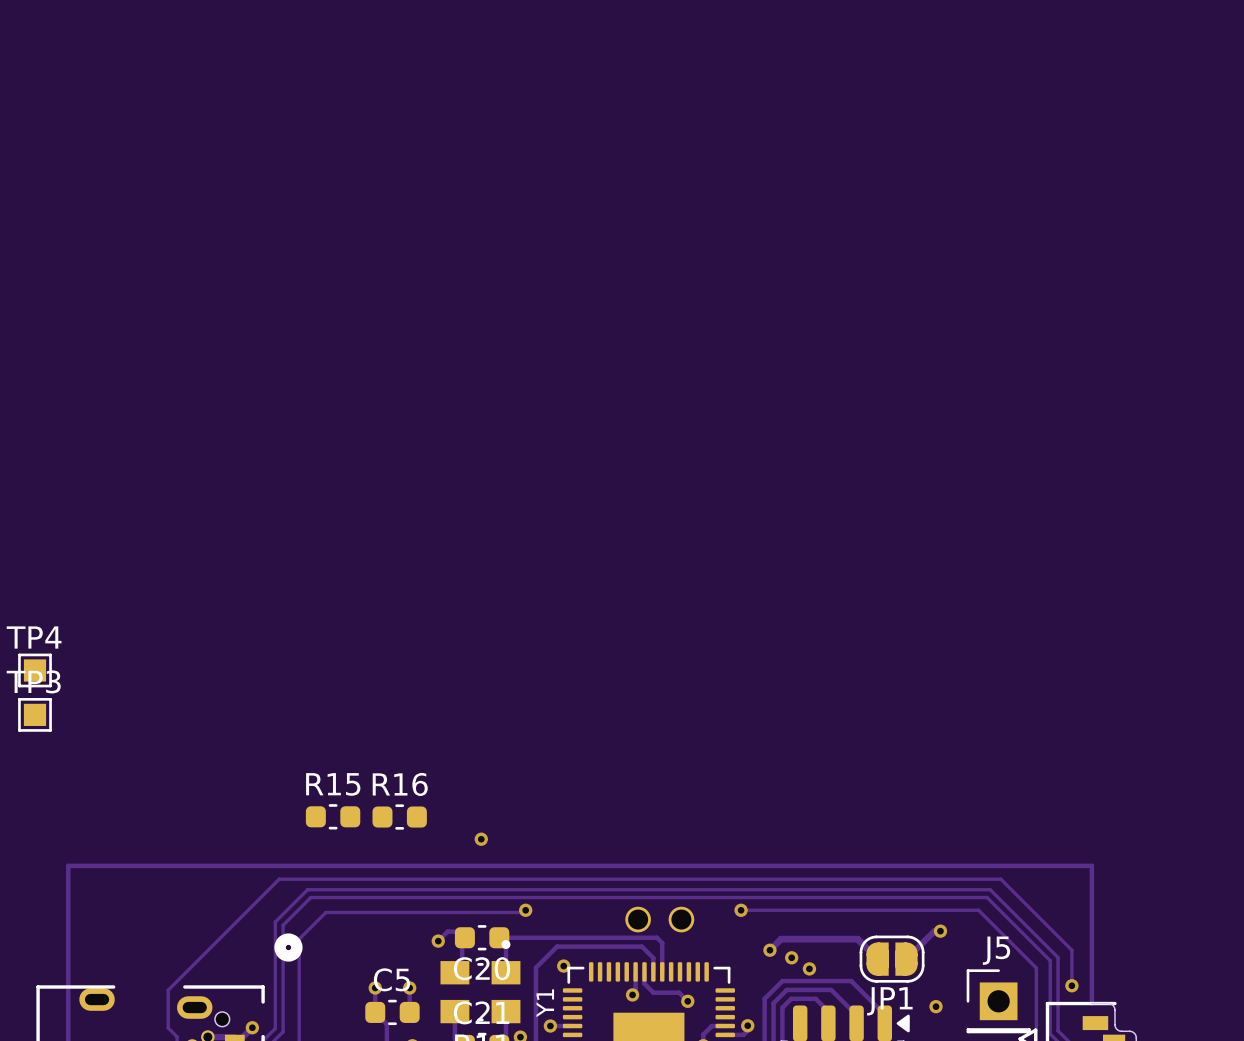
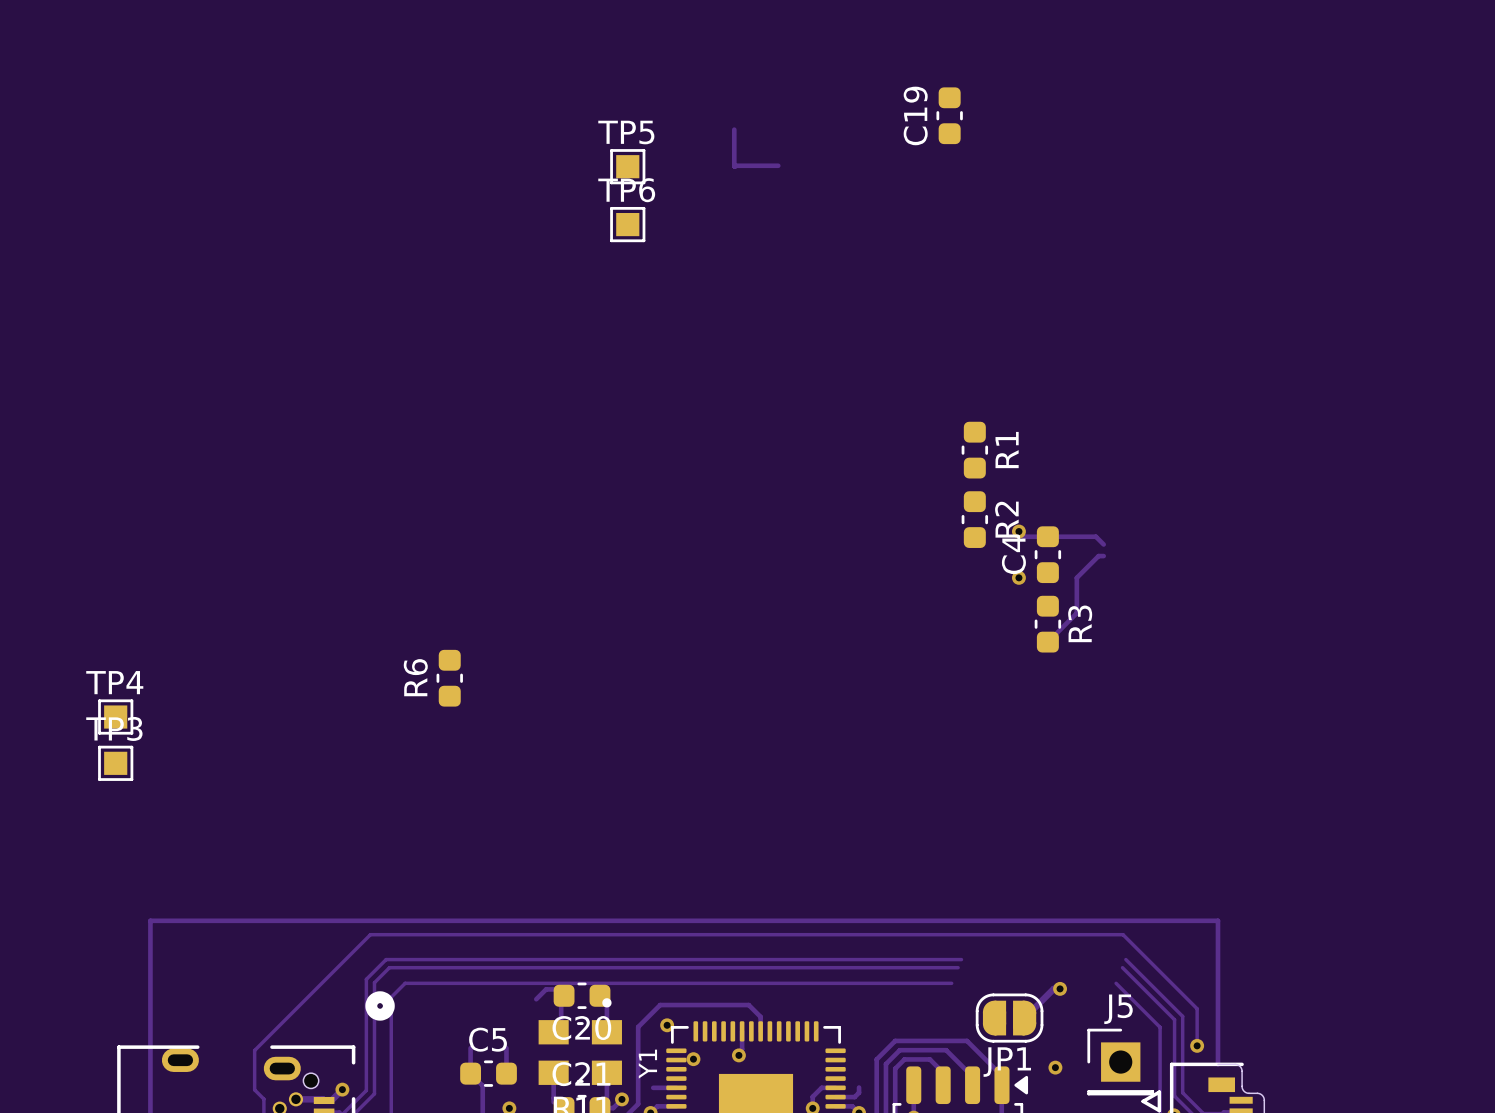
C19: none -> (949, 115)
track: none -> (734, 129) (734, 166) (778, 165)
TP5: none -> (627, 166)
TP6: none -> (627, 224)
R1: none -> (974, 450)
R2: none -> (974, 519)
track: none -> (1018, 531) (1024, 536) (1095, 536) (1103, 544)
via: none -> (1018, 531)
C4: none -> (1047, 554)
track: none -> (1103, 556) (1098, 556) (1076, 577) (1076, 613) (1047, 642)
via: none -> (1018, 577)
R3: none -> (1047, 624)
R6: none -> (449, 678)
R15: (333, 816) -> none
R16: (399, 817) -> none
via: (481, 839) -> none
track: (294, 903) (307, 889) (990, 889) (1003, 903) -> (386, 959) (961, 959)
track: (297, 910) (310, 897) (987, 897) (1000, 910) -> (389, 967) (958, 967)
track: (525, 910) (523, 912) (325, 912) (312, 925) -> (951, 983) (405, 983)
via: (525, 910) -> none
track: (741, 910) (978, 910) (994, 925) -> none
via: (741, 910) -> none
part: (659, 919) -> none
track: (499, 937) (656, 937) (662, 943) (662, 971) -> none
via: (438, 941) -> none
track: (769, 950) (781, 939) (857, 939) (877, 959) -> none
via: (769, 950) -> none
via: (791, 957) -> none
via: (809, 968) -> none
track: (644, 971) (644, 983) (653, 992) (679, 992) (687, 1001) -> none
via: (375, 987) -> none
via: (409, 987) -> none
via: none -> (693, 1059)
via: (687, 1001) -> none
via: (747, 1025) -> none
via: (550, 1026) -> none

